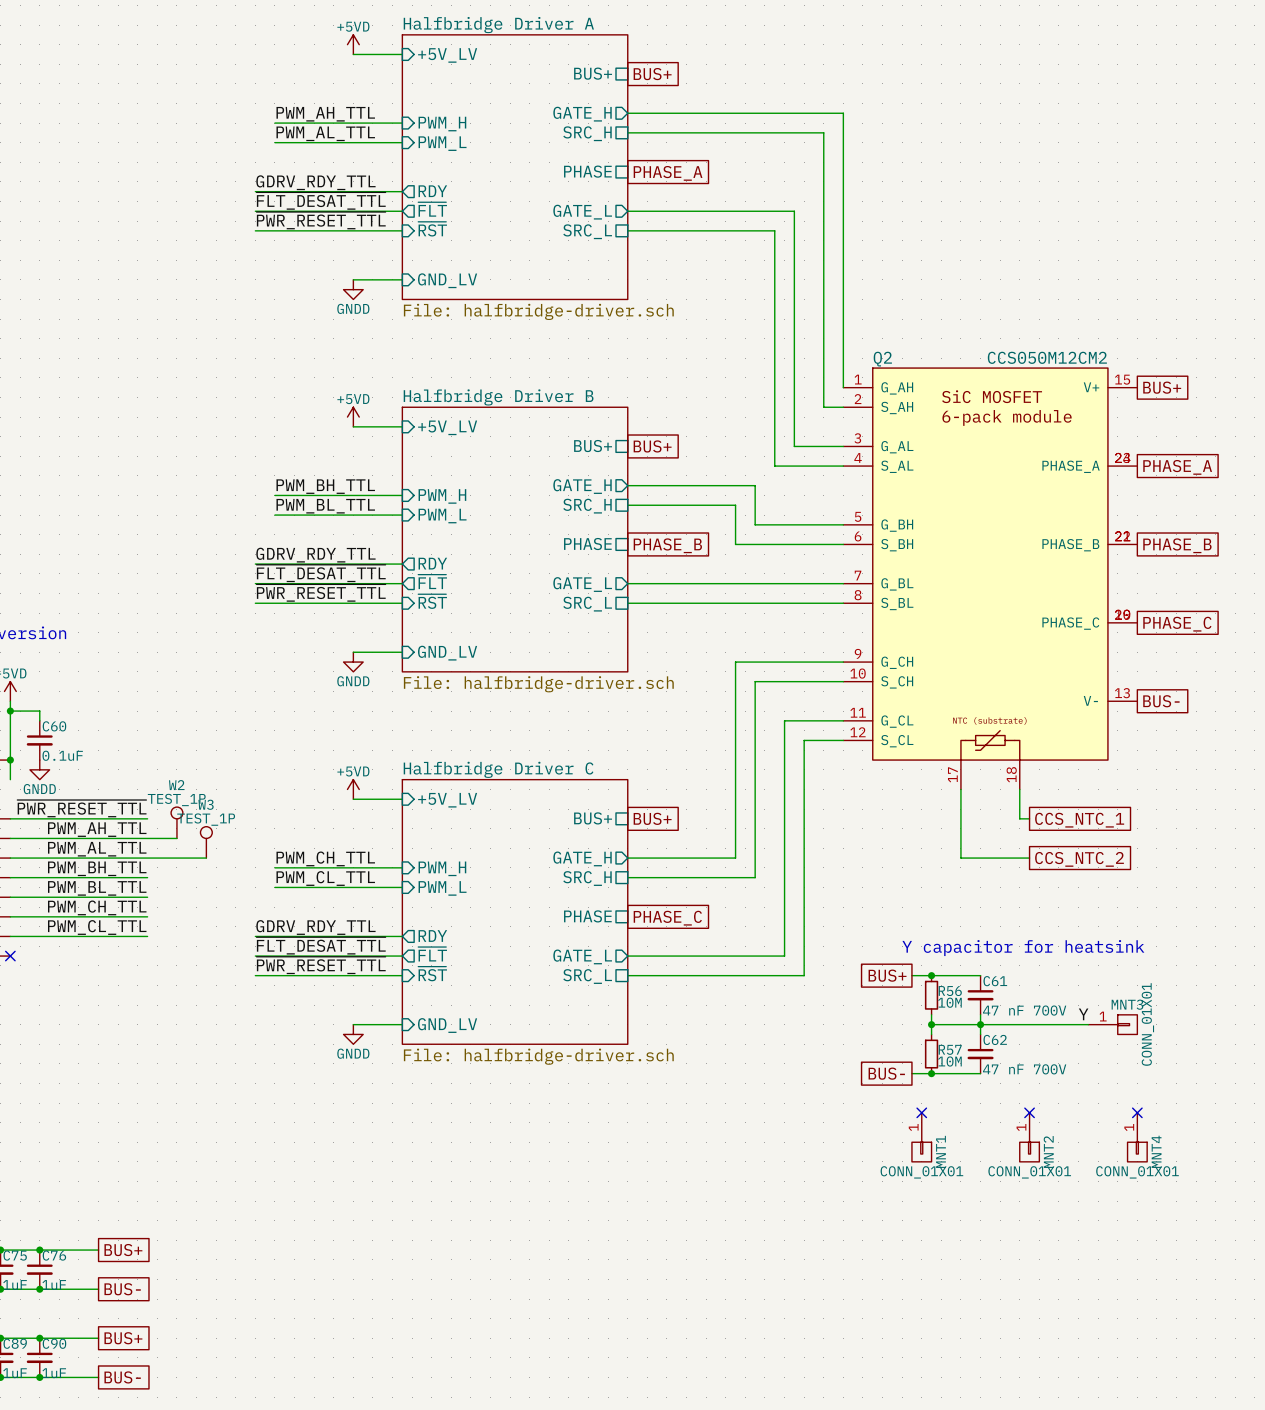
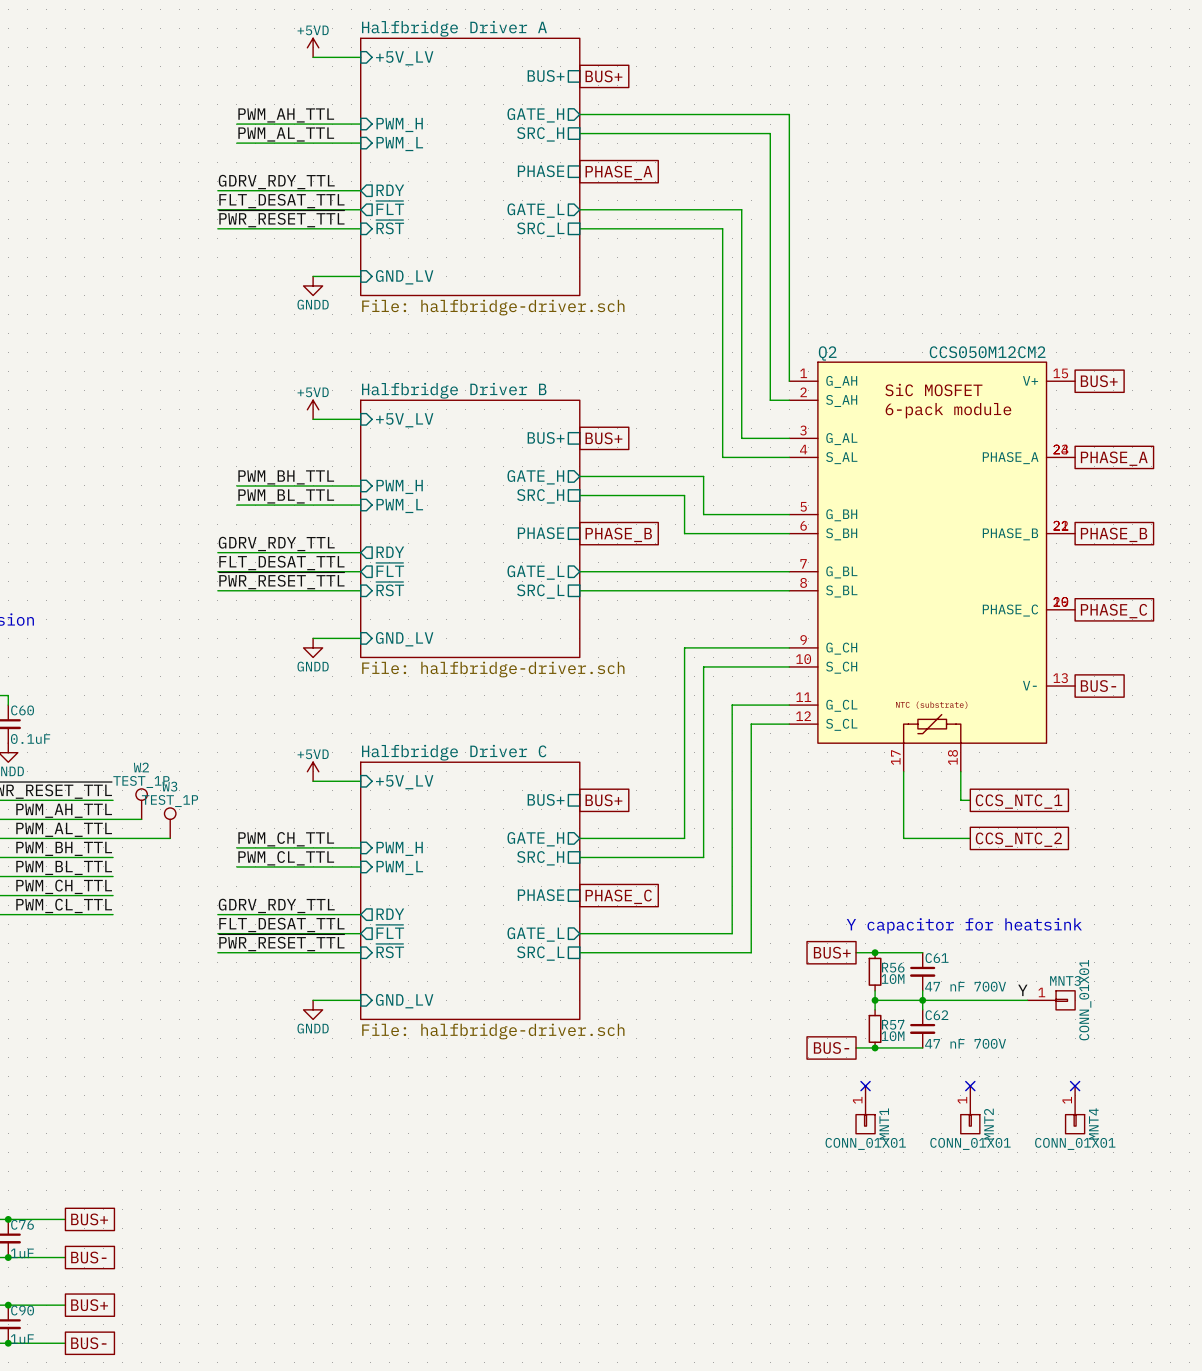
label: ~{FLT_DESAT_TTL} (321, 201) -> FLT_DESAT_TTL (281, 201)
label: ~{FLT_DESAT_TTL} (321, 573) -> FLT_DESAT_TTL (281, 563)
label: ~{FLT_DESAT_TTL} (321, 945) -> FLT_DESAT_TTL (281, 924)

